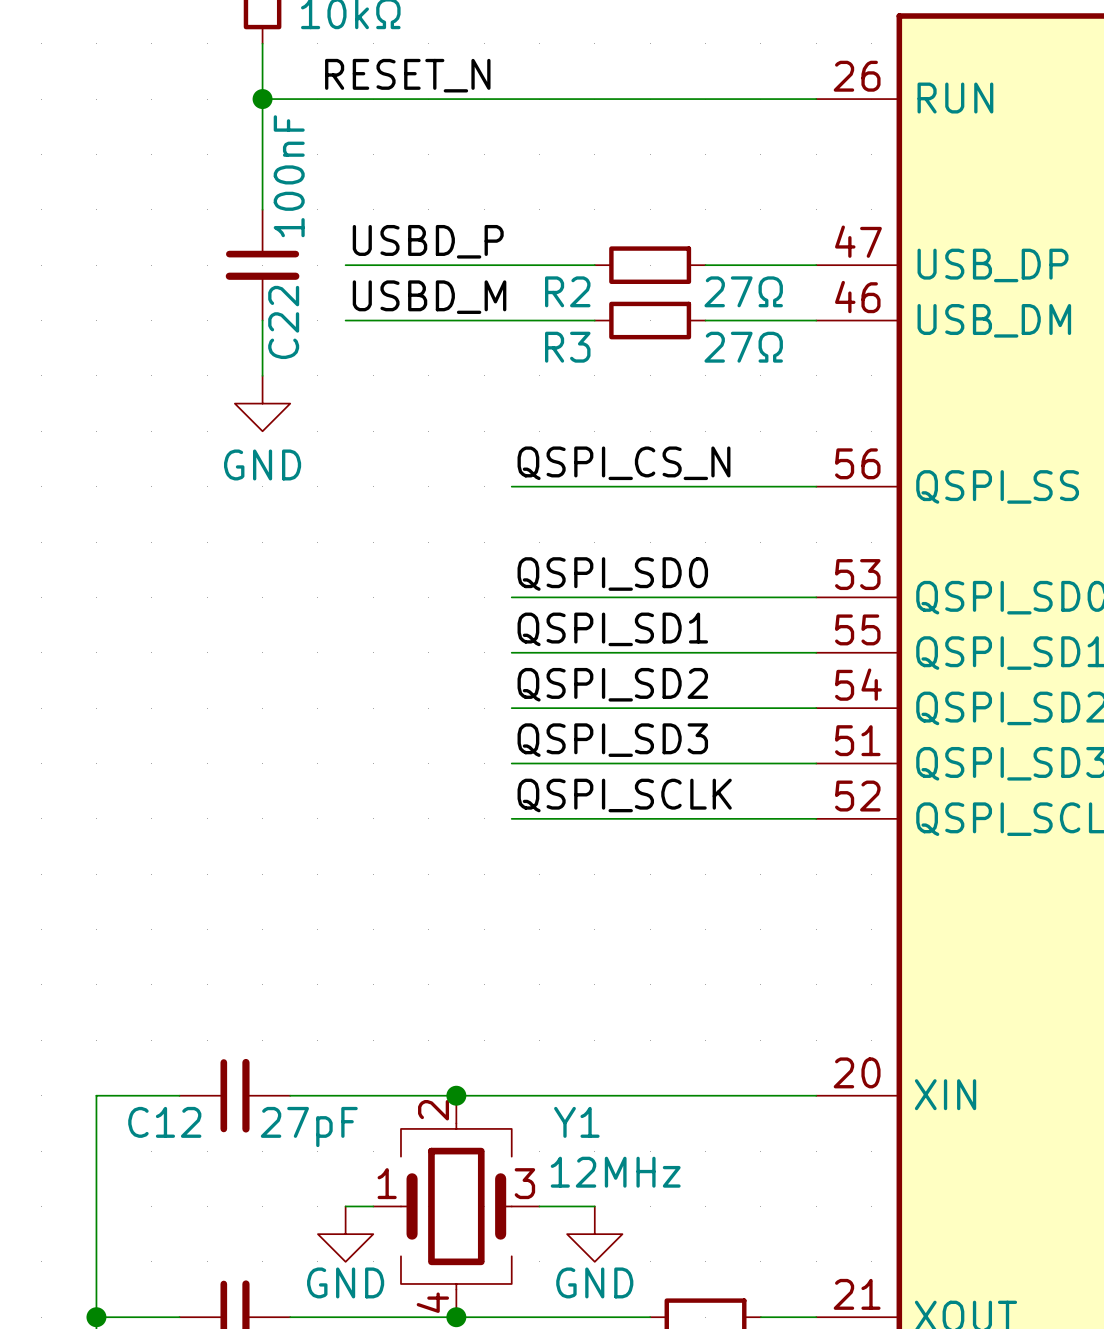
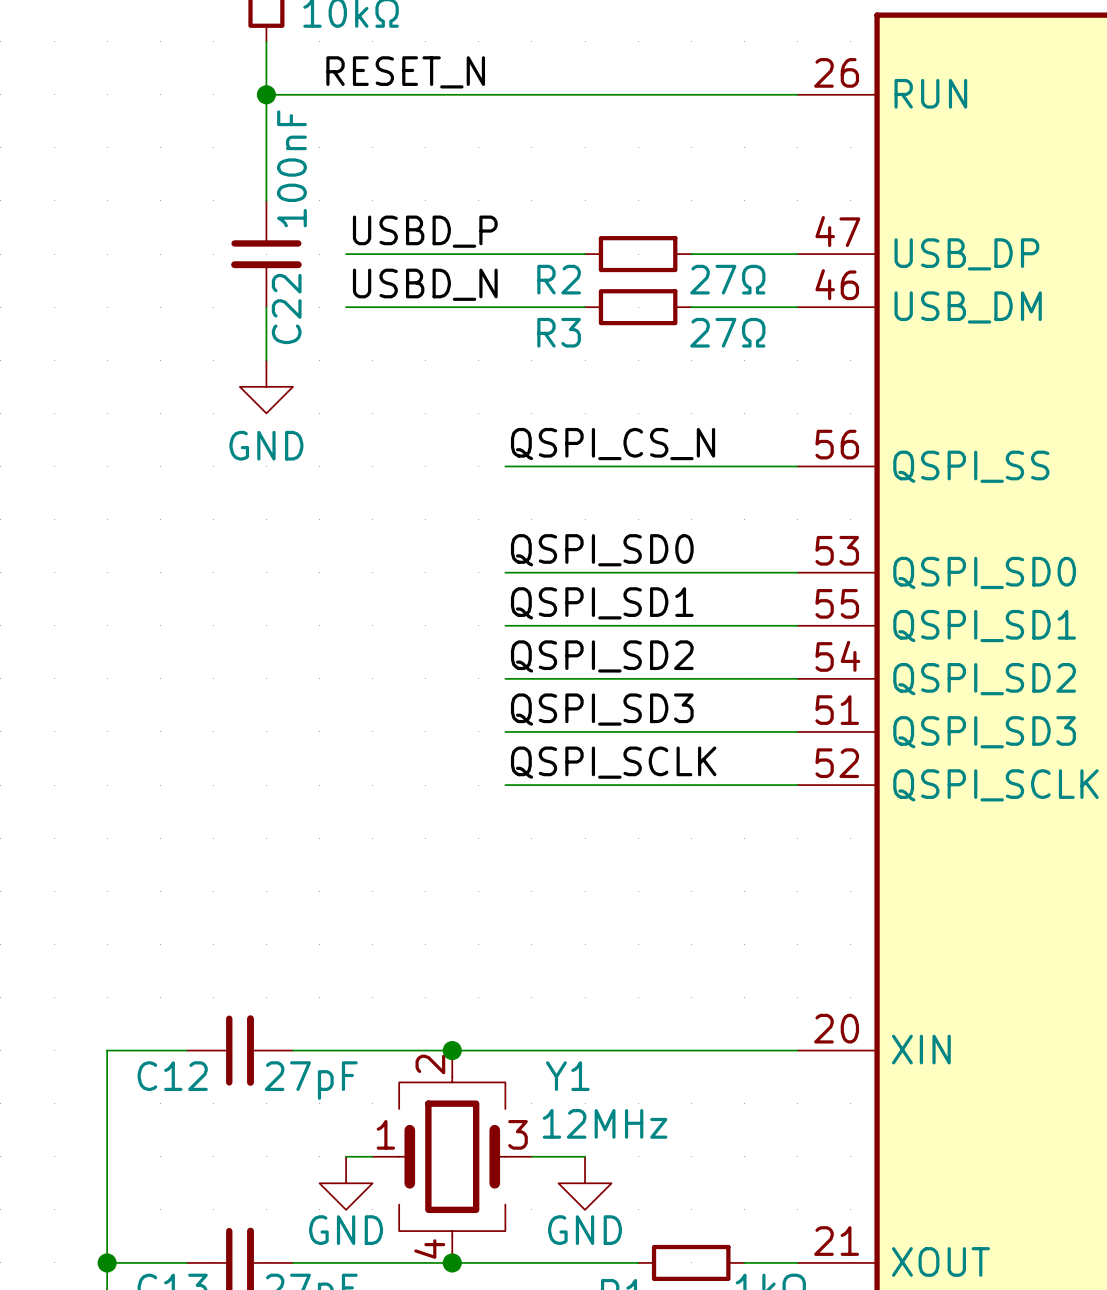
label: USBD_M (429, 297) -> USBD_N (425, 284)

